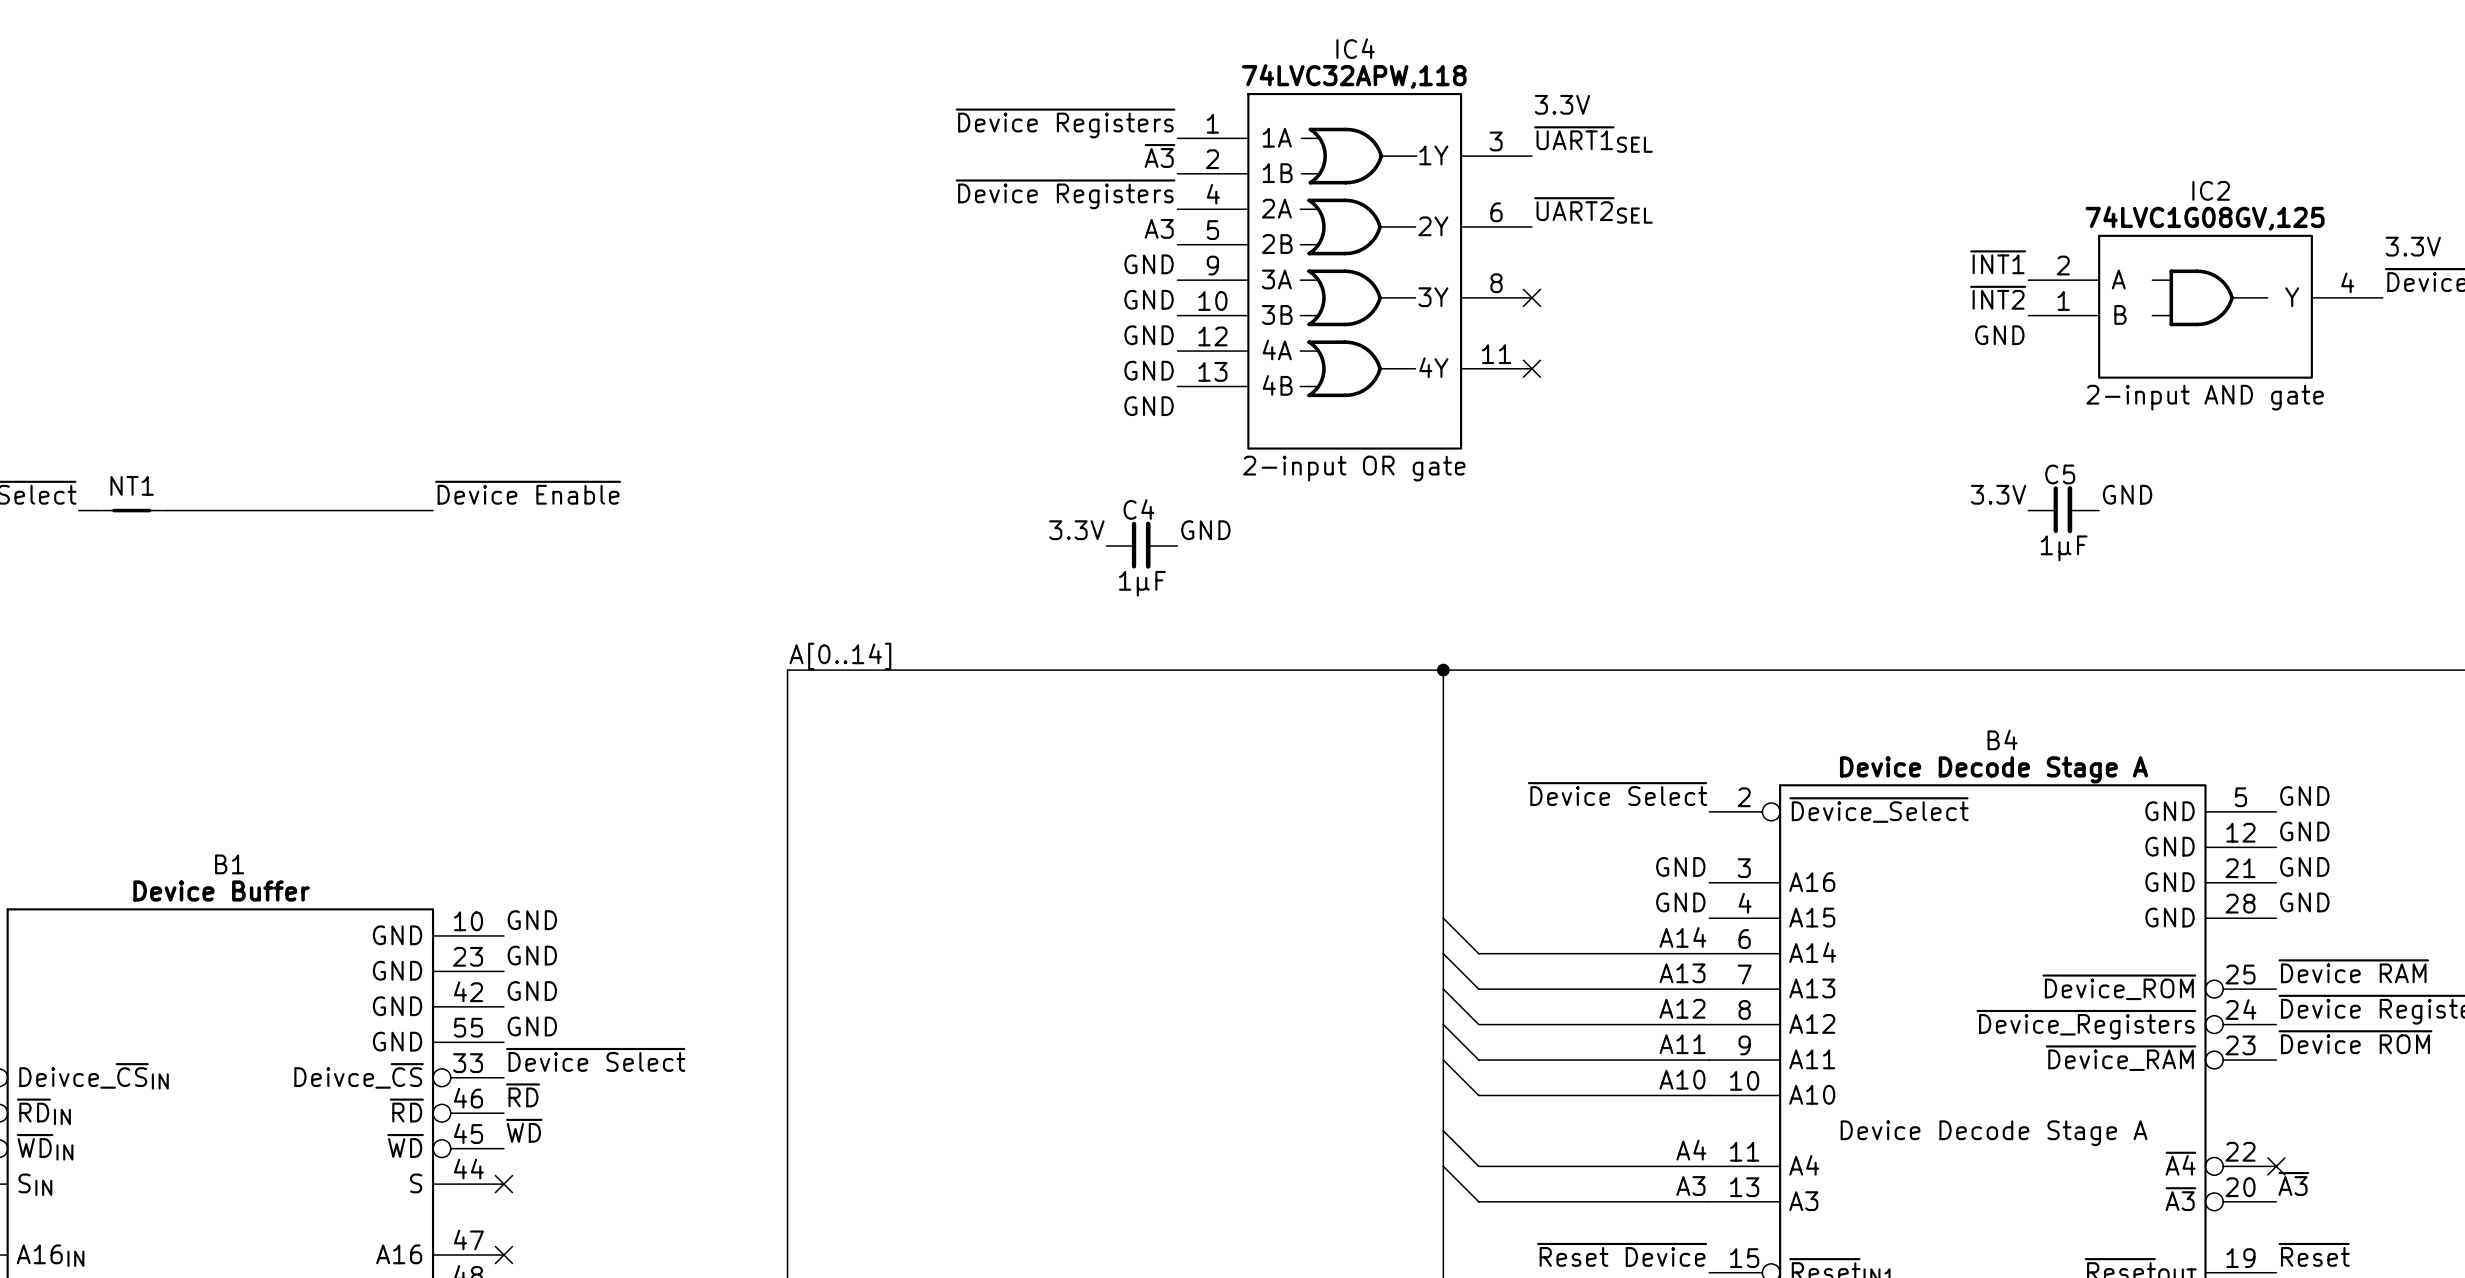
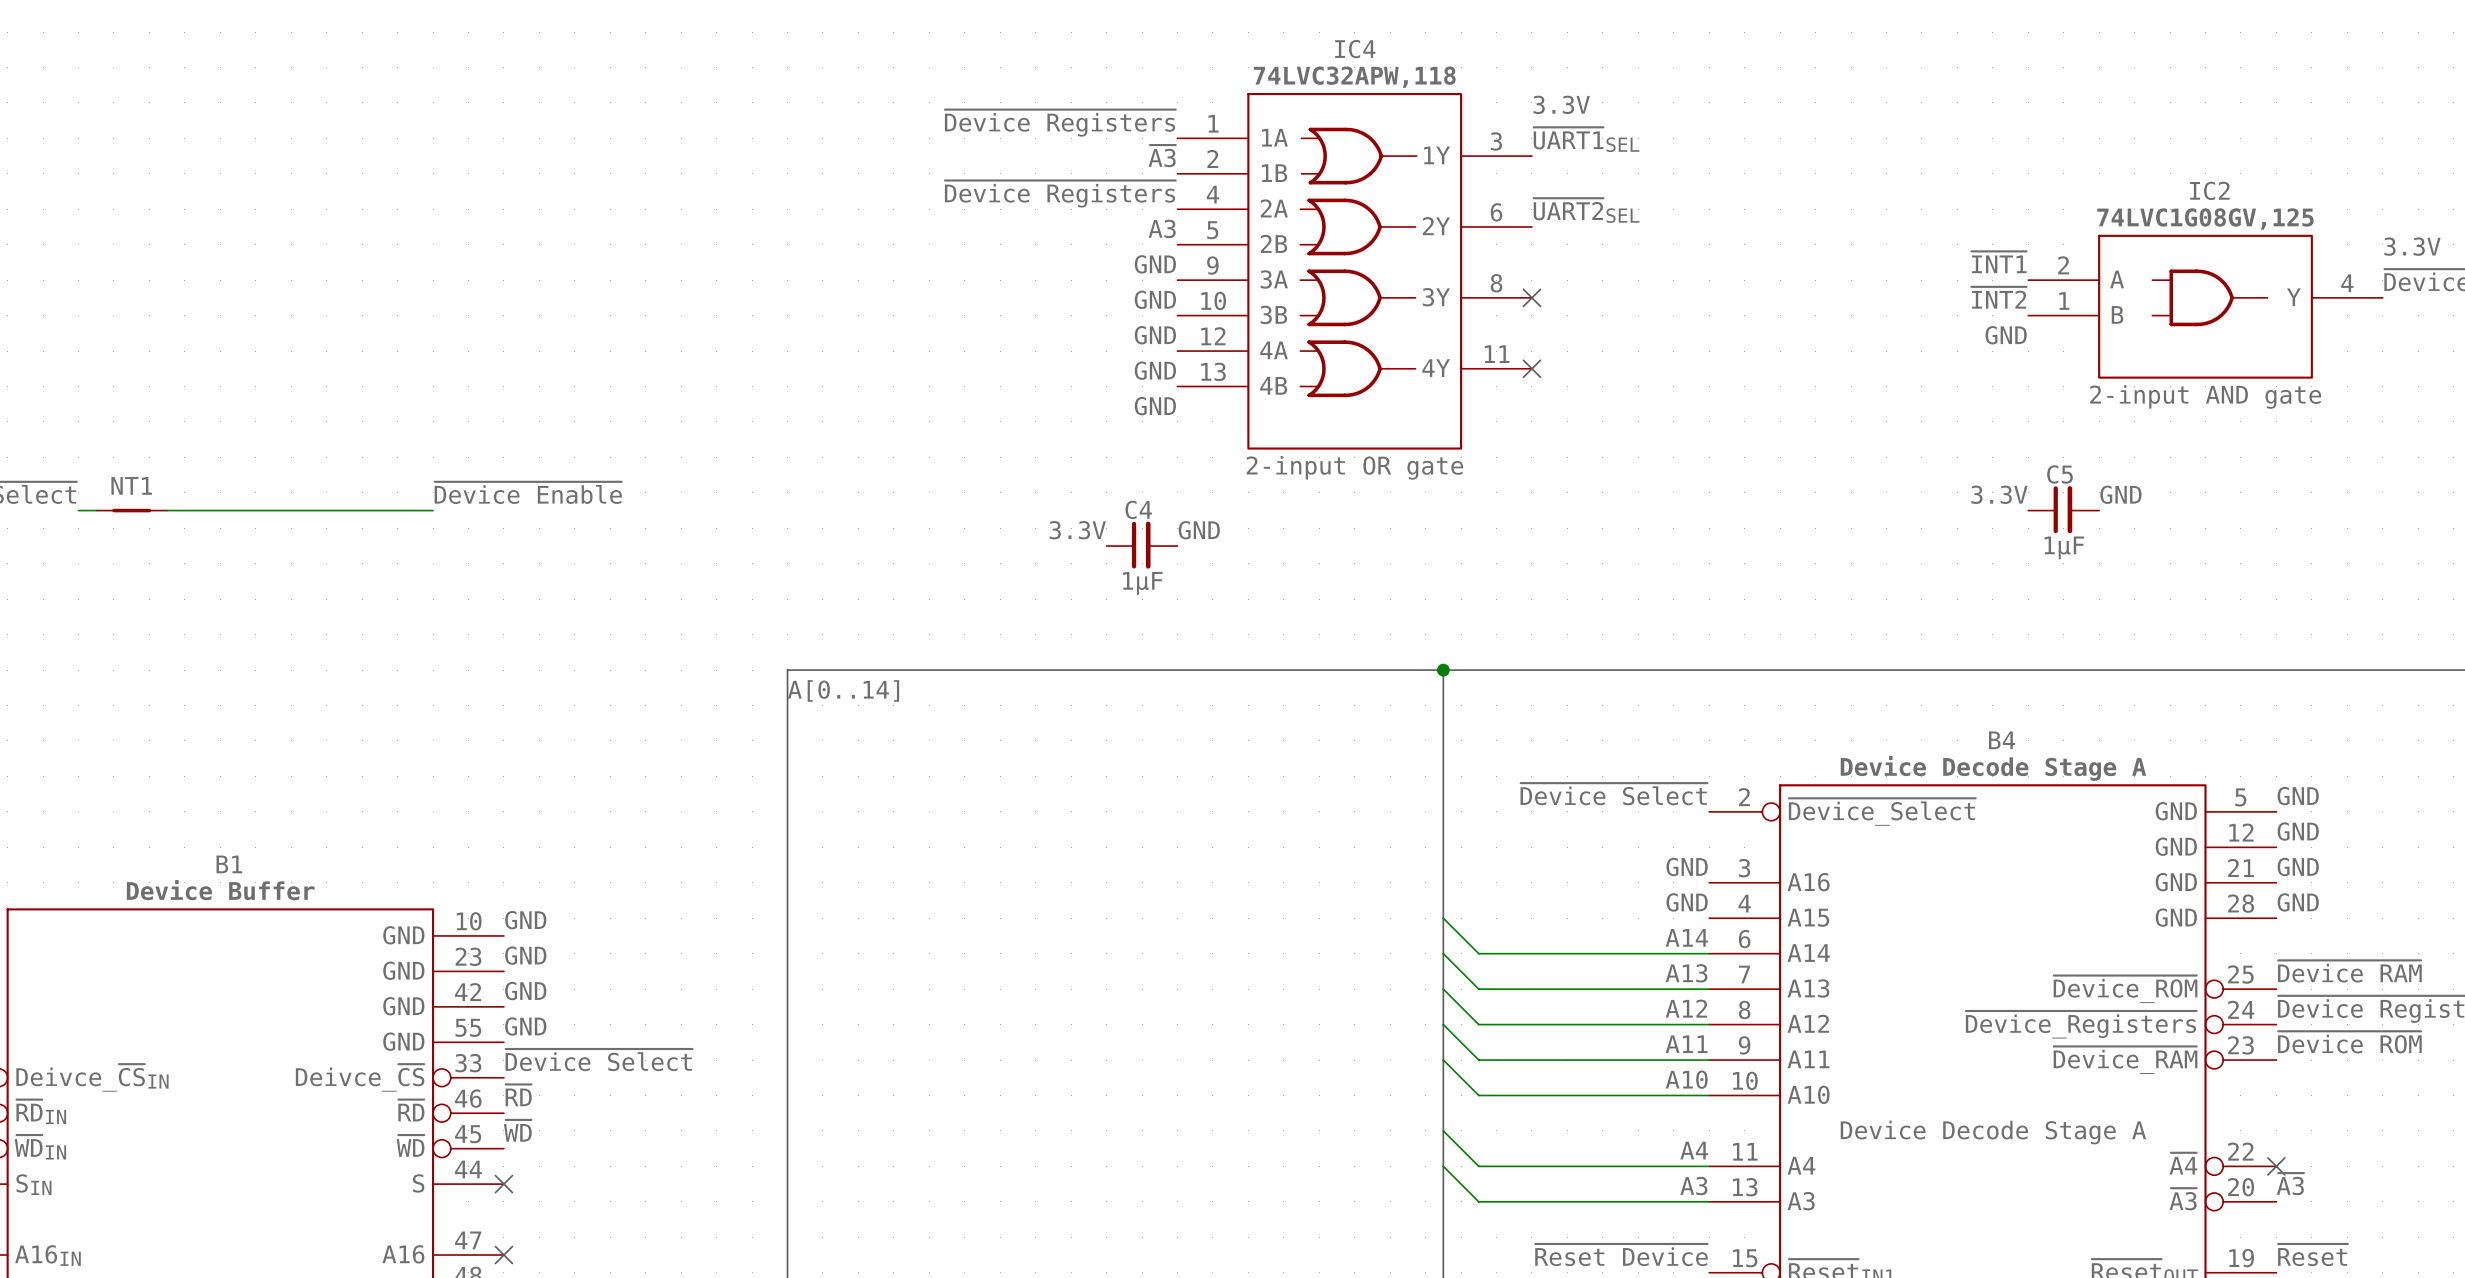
label position: A[0..14] (840, 656) -> A[0..14] (843, 690)

